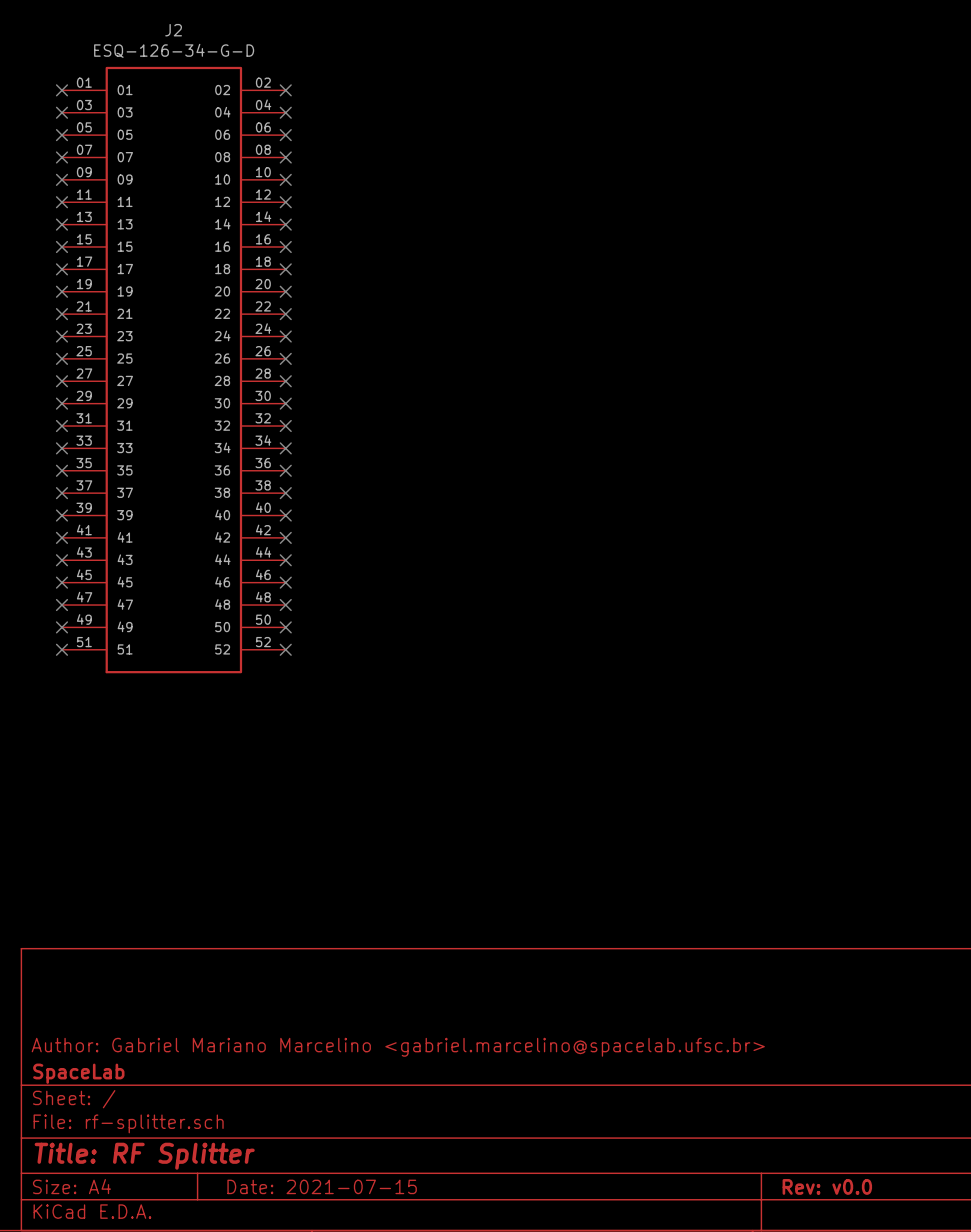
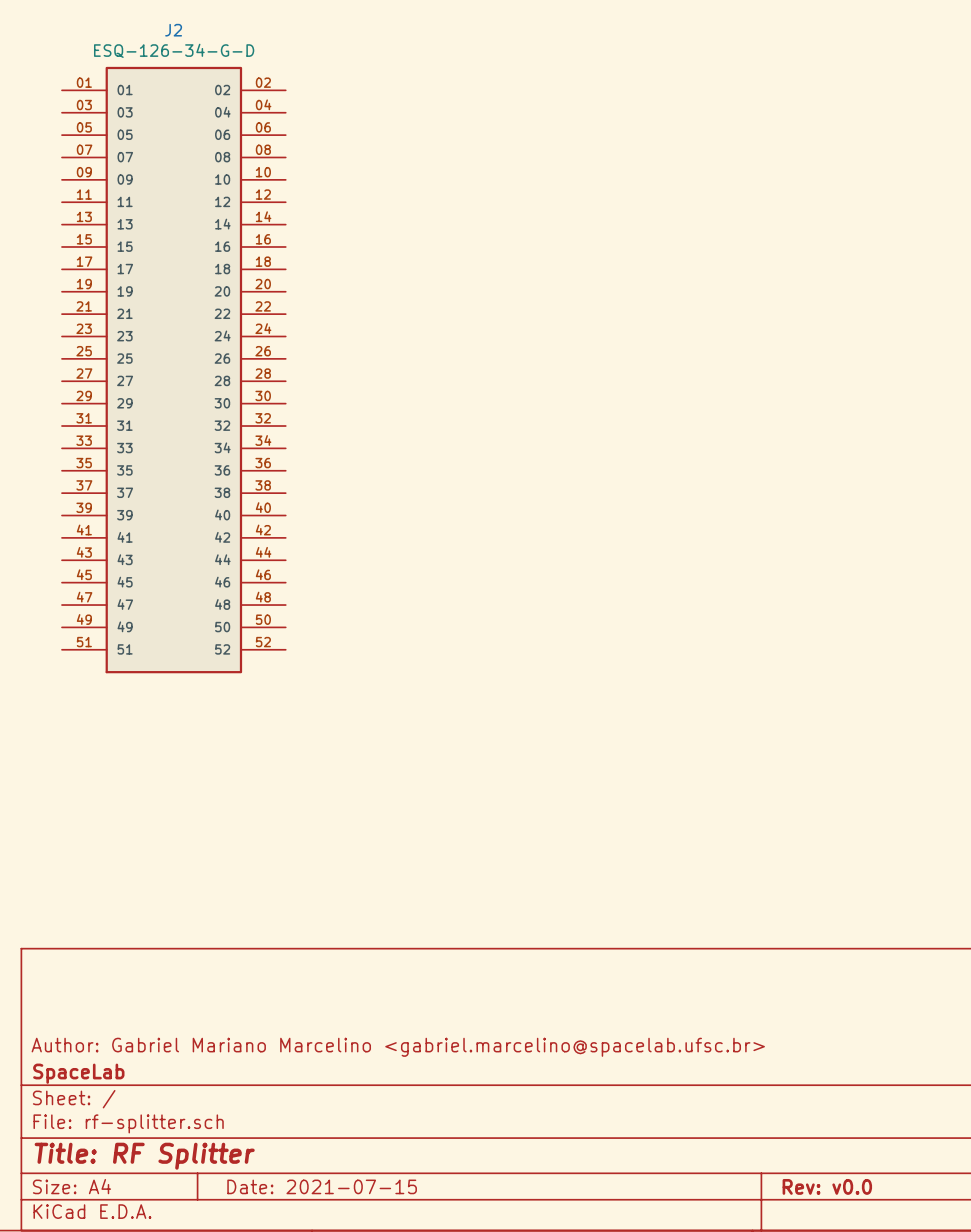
no-connect mark: (61, 90) -> none
no-connect mark: (285, 90) -> none
no-connect mark: (61, 112) -> none
no-connect mark: (285, 112) -> none
no-connect mark: (61, 135) -> none
no-connect mark: (285, 135) -> none
no-connect mark: (61, 157) -> none
no-connect mark: (285, 157) -> none
no-connect mark: (61, 179) -> none
no-connect mark: (285, 179) -> none
no-connect mark: (61, 202) -> none
no-connect mark: (285, 202) -> none
no-connect mark: (61, 224) -> none
no-connect mark: (285, 224) -> none
no-connect mark: (61, 246) -> none
no-connect mark: (285, 246) -> none
no-connect mark: (61, 269) -> none
no-connect mark: (285, 269) -> none
no-connect mark: (61, 291) -> none
no-connect mark: (285, 291) -> none
no-connect mark: (61, 314) -> none
no-connect mark: (285, 314) -> none
no-connect mark: (61, 336) -> none
no-connect mark: (285, 336) -> none
no-connect mark: (61, 358) -> none
no-connect mark: (285, 358) -> none
no-connect mark: (61, 381) -> none
no-connect mark: (285, 381) -> none
no-connect mark: (61, 403) -> none
no-connect mark: (285, 403) -> none
no-connect mark: (61, 426) -> none
no-connect mark: (285, 426) -> none
no-connect mark: (61, 448) -> none
no-connect mark: (285, 448) -> none
no-connect mark: (61, 470) -> none
no-connect mark: (285, 470) -> none
no-connect mark: (61, 493) -> none
no-connect mark: (285, 493) -> none
no-connect mark: (61, 515) -> none
no-connect mark: (285, 515) -> none
no-connect mark: (61, 537) -> none
no-connect mark: (285, 537) -> none
no-connect mark: (61, 560) -> none
no-connect mark: (285, 560) -> none
no-connect mark: (61, 582) -> none
no-connect mark: (285, 582) -> none
no-connect mark: (61, 605) -> none
no-connect mark: (285, 605) -> none
no-connect mark: (61, 627) -> none
no-connect mark: (285, 627) -> none
no-connect mark: (61, 649) -> none
no-connect mark: (285, 649) -> none

